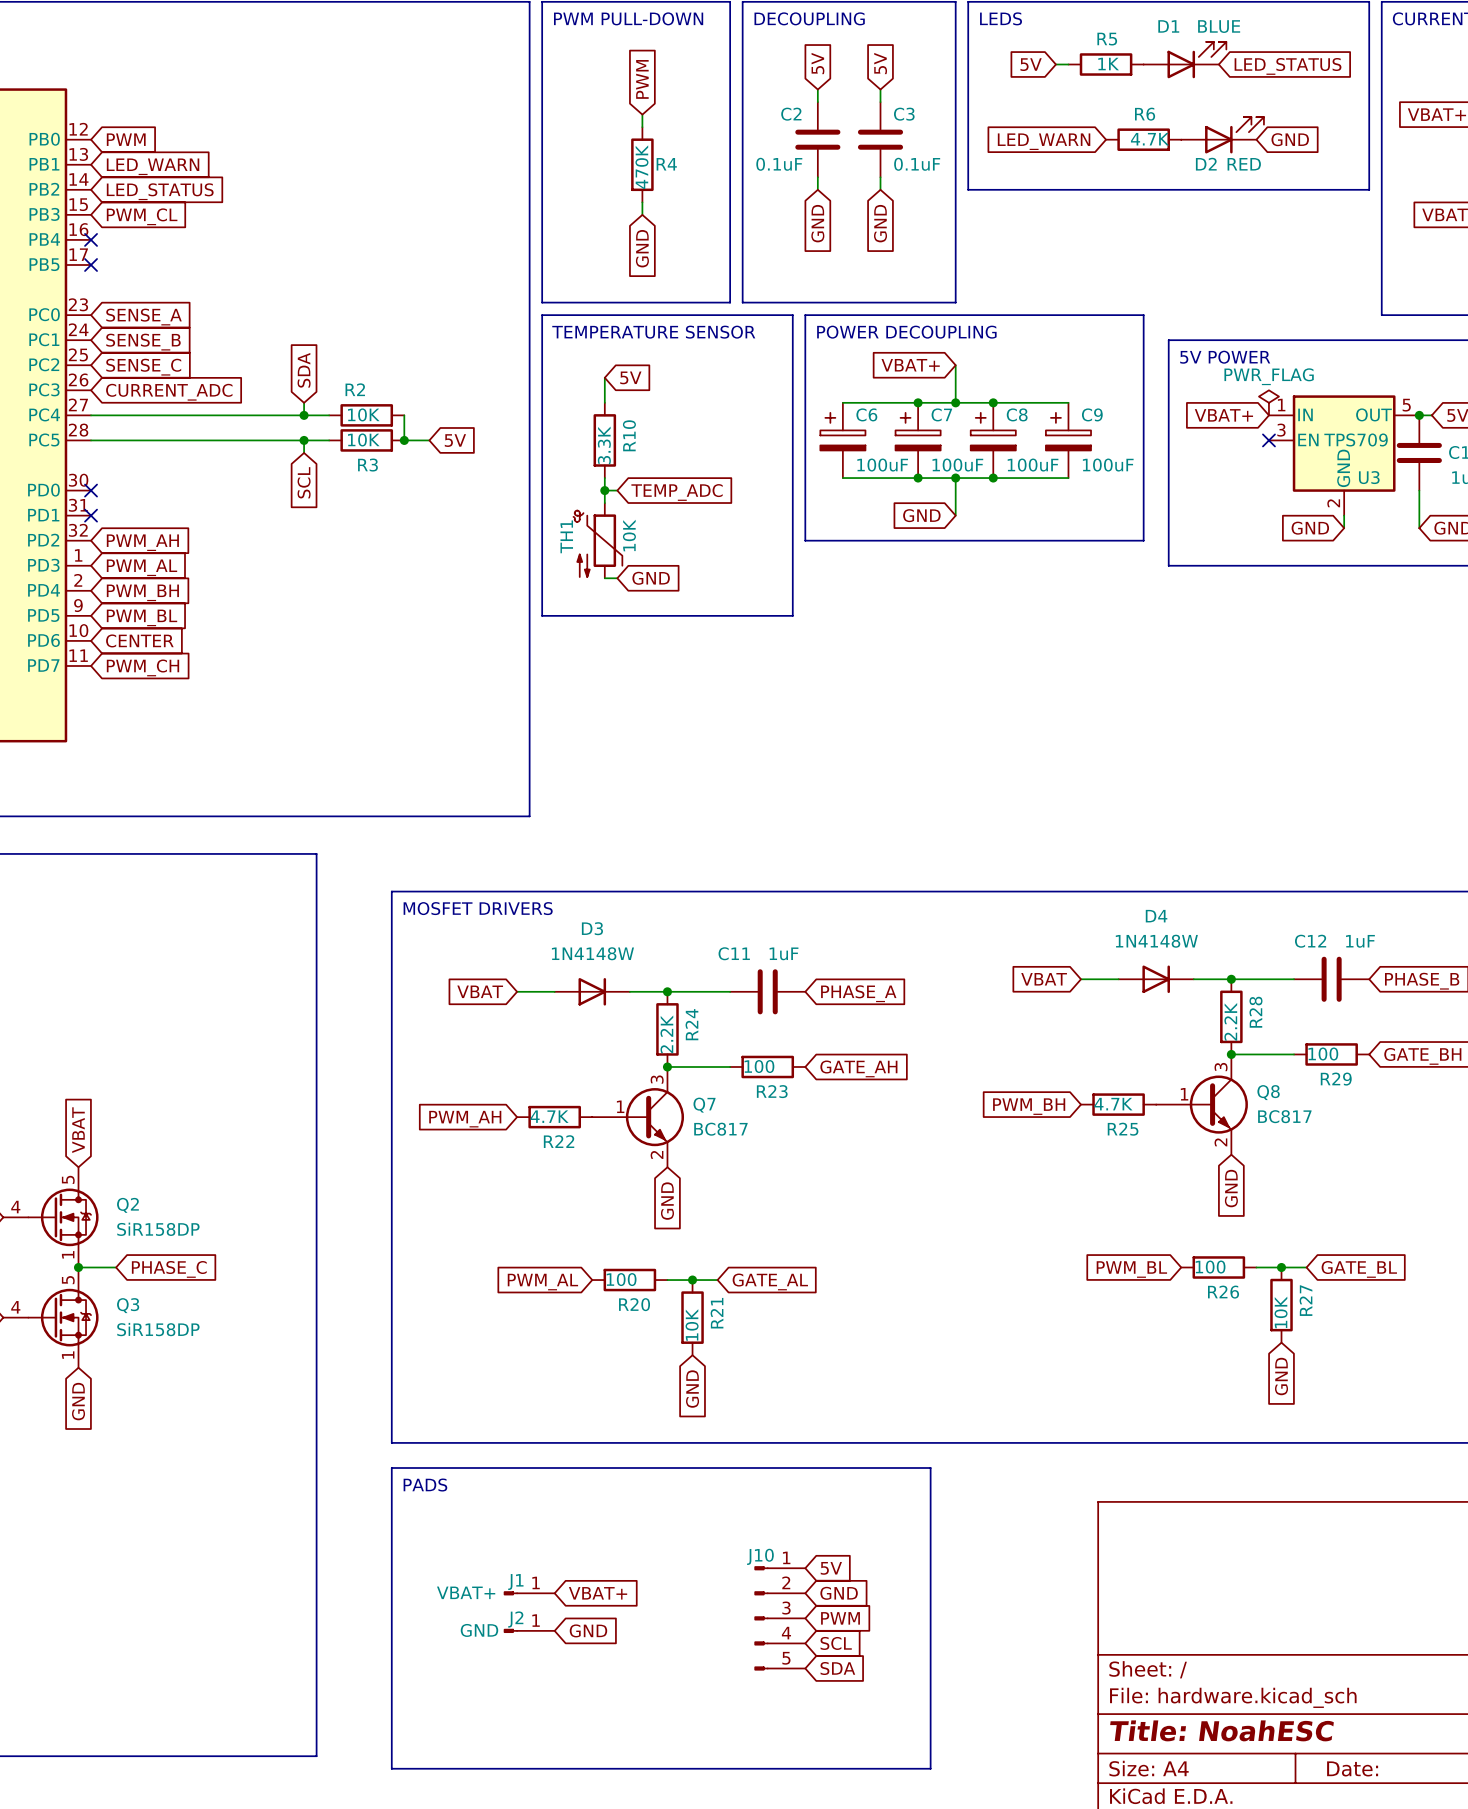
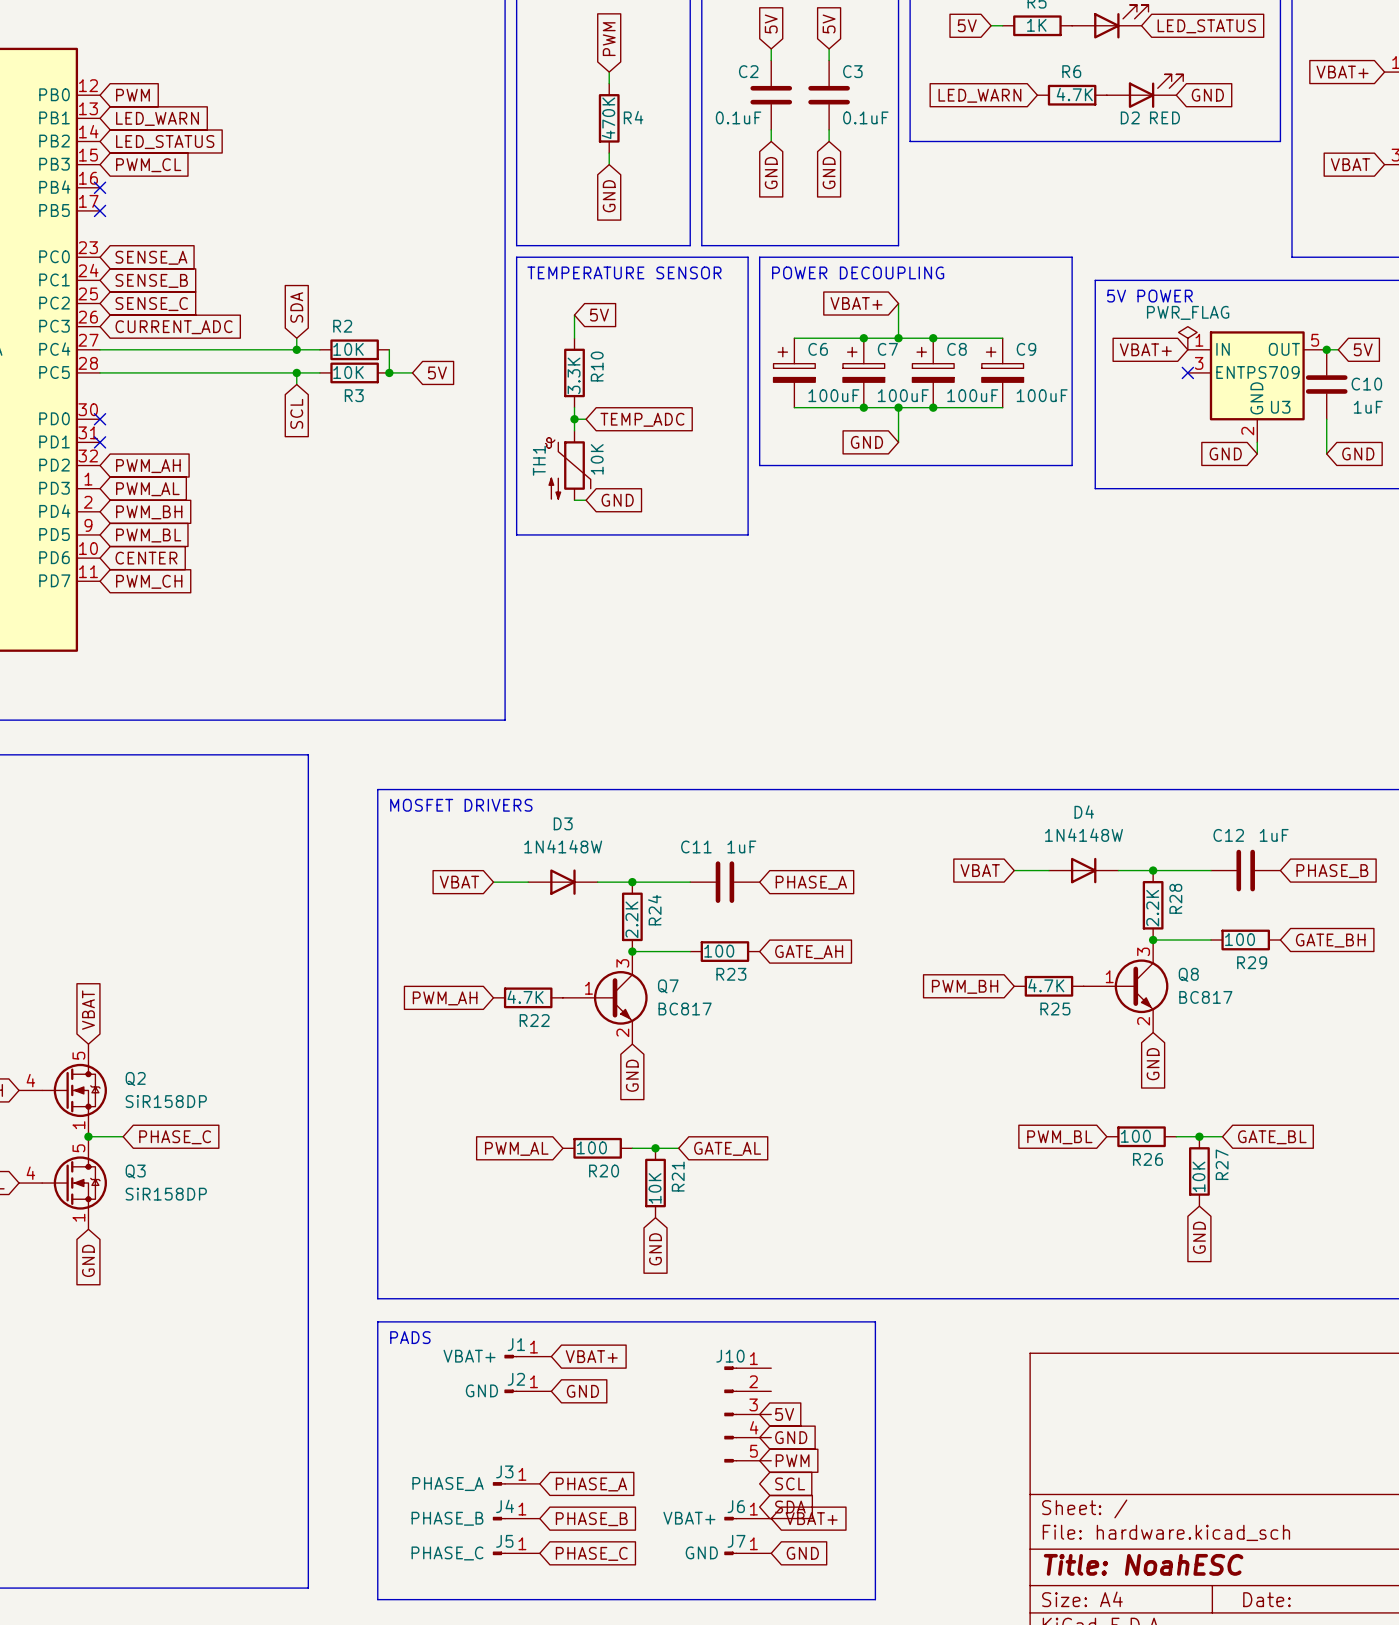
J1 position: (529, 1593) -> (527, 1356)
global label position: VBAT+ (598, 1593) -> VBAT+ (591, 1356)
J10 position: (779, 1618) -> (747, 1414)
J2 position: (529, 1630) -> (527, 1391)
global label position: GND (588, 1630) -> GND (582, 1391)
J3: none -> PHASE_A (516, 1483)
global label: none -> PHASE_A (591, 1484)
J4: none -> PHASE_B (516, 1518)
J6: none -> VBAT+ (747, 1518)
global label: none -> VBAT+ (811, 1518)
global label: none -> PHASE_B (591, 1519)
J5: none -> PHASE_C (516, 1553)
J7: none -> GND (747, 1553)
global label: none -> GND (802, 1553)
global label: none -> PHASE_C (591, 1553)

